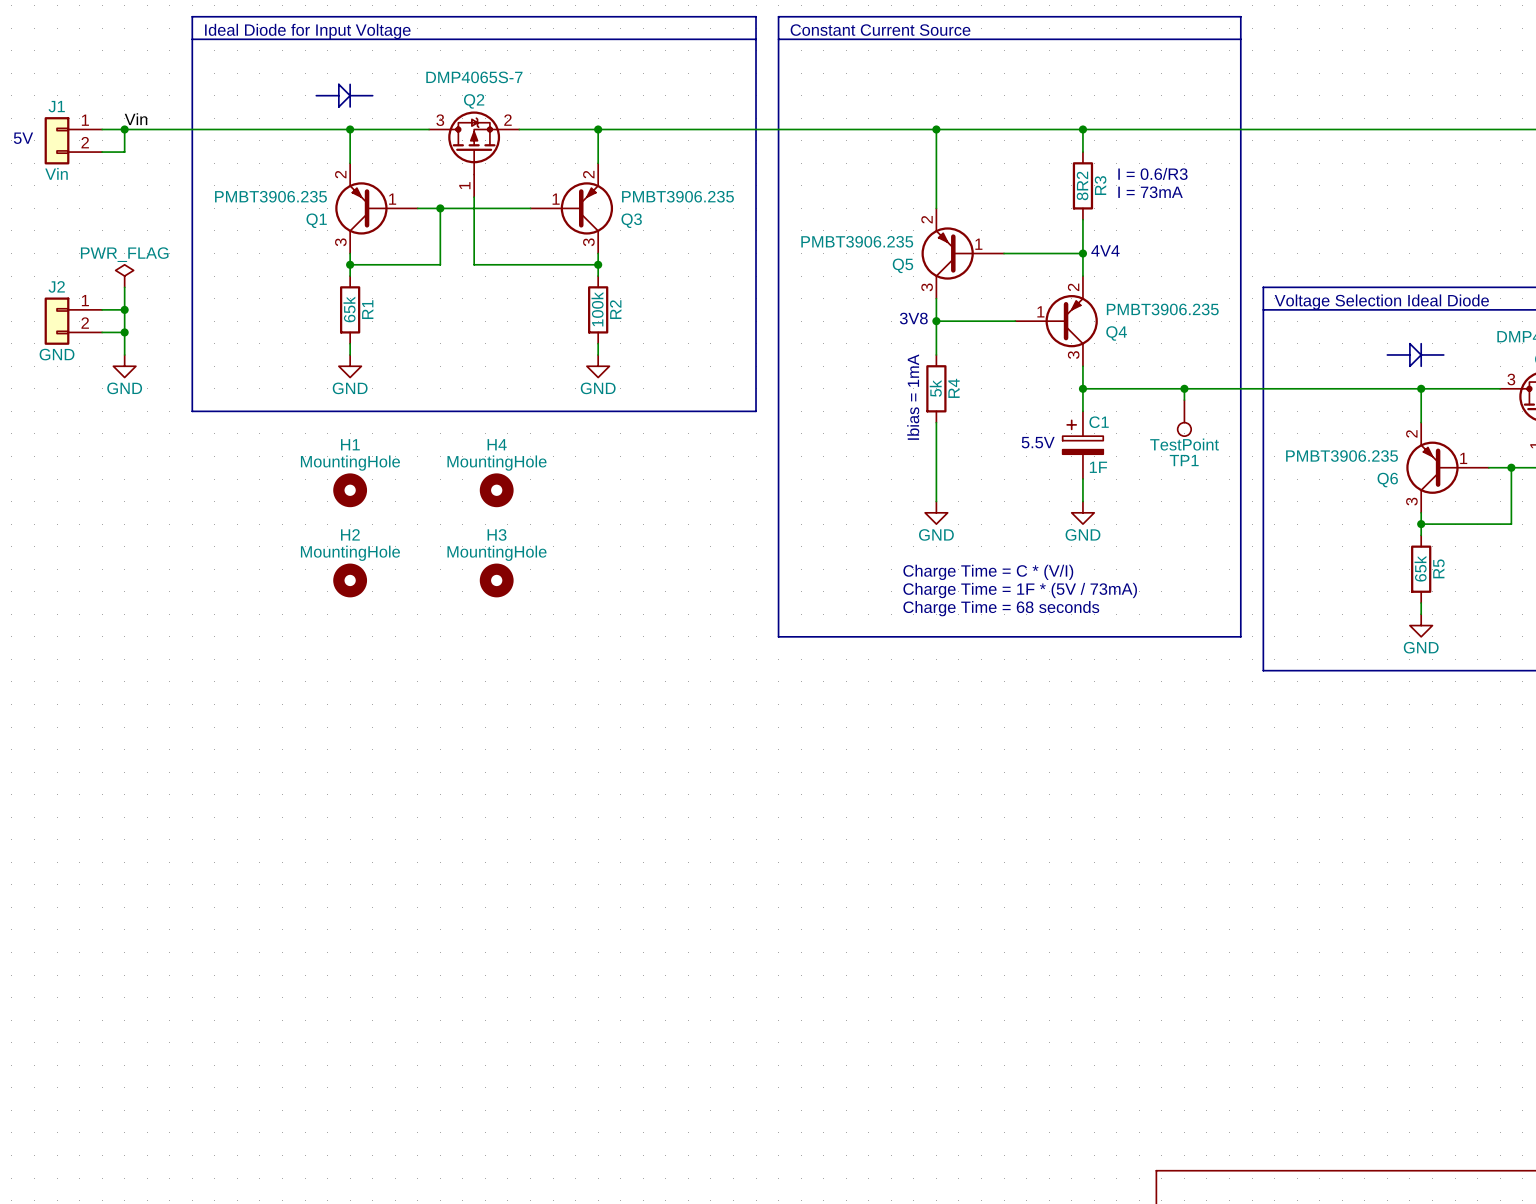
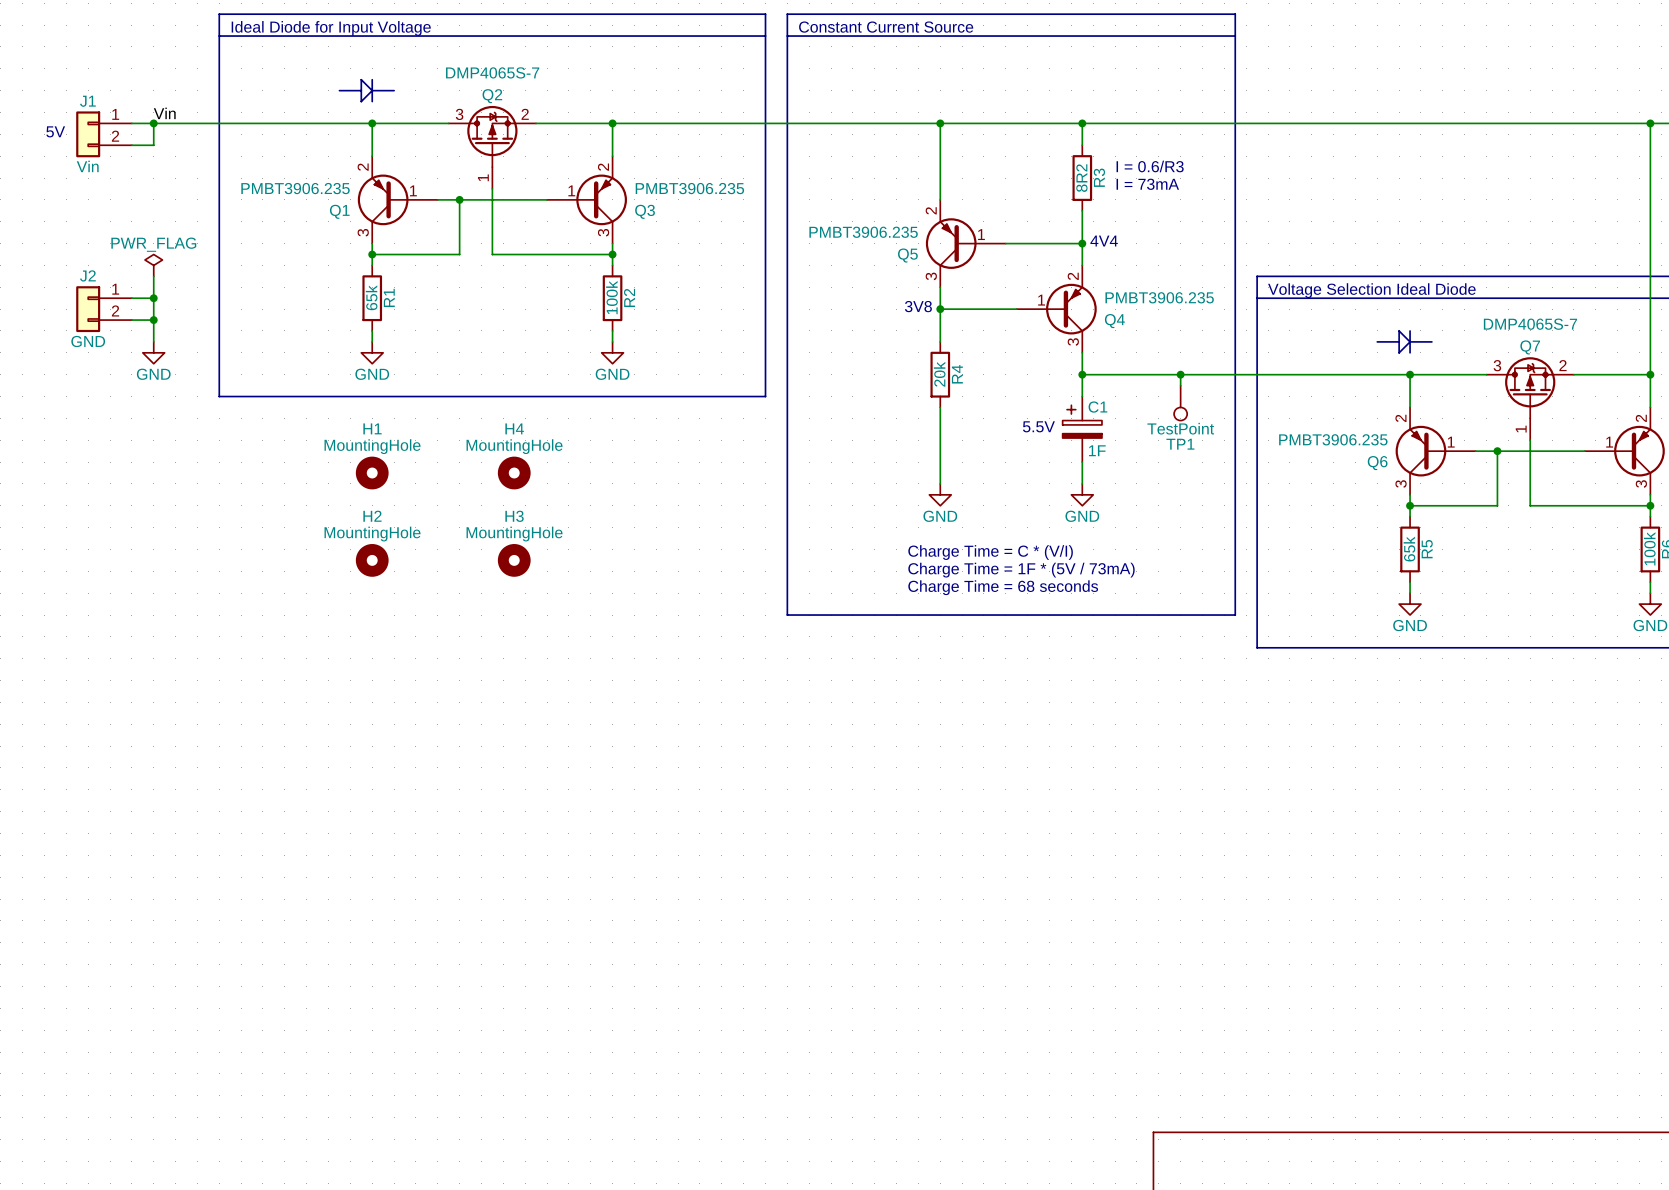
R4 value: 5k (935, 388) -> 20k (939, 374)
text: Ibias = 1mA (913, 397) -> none

